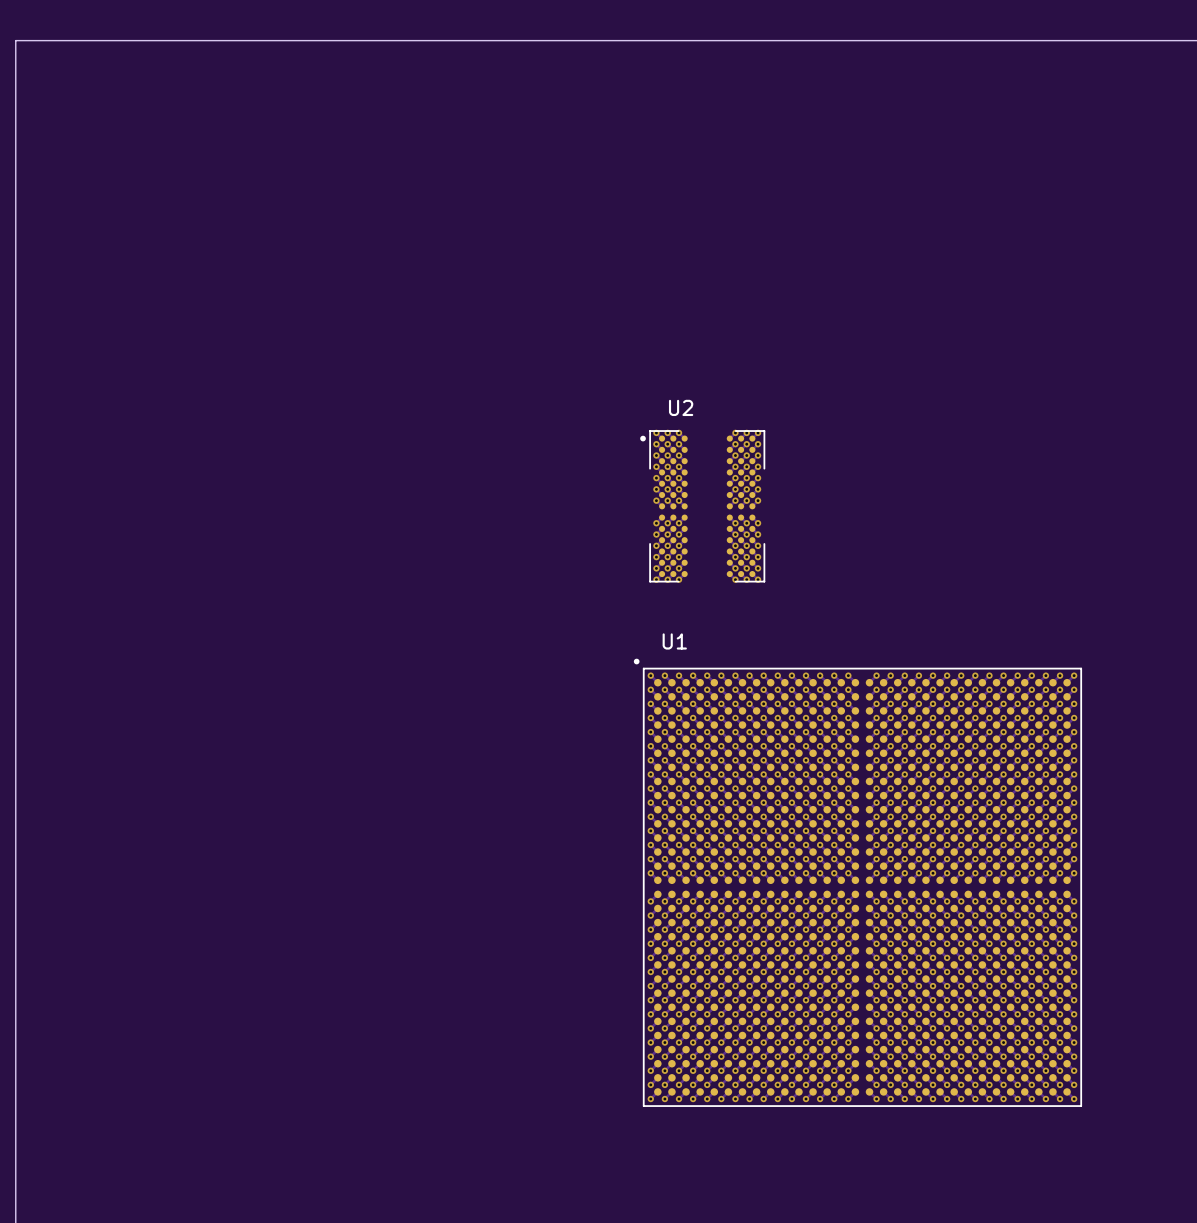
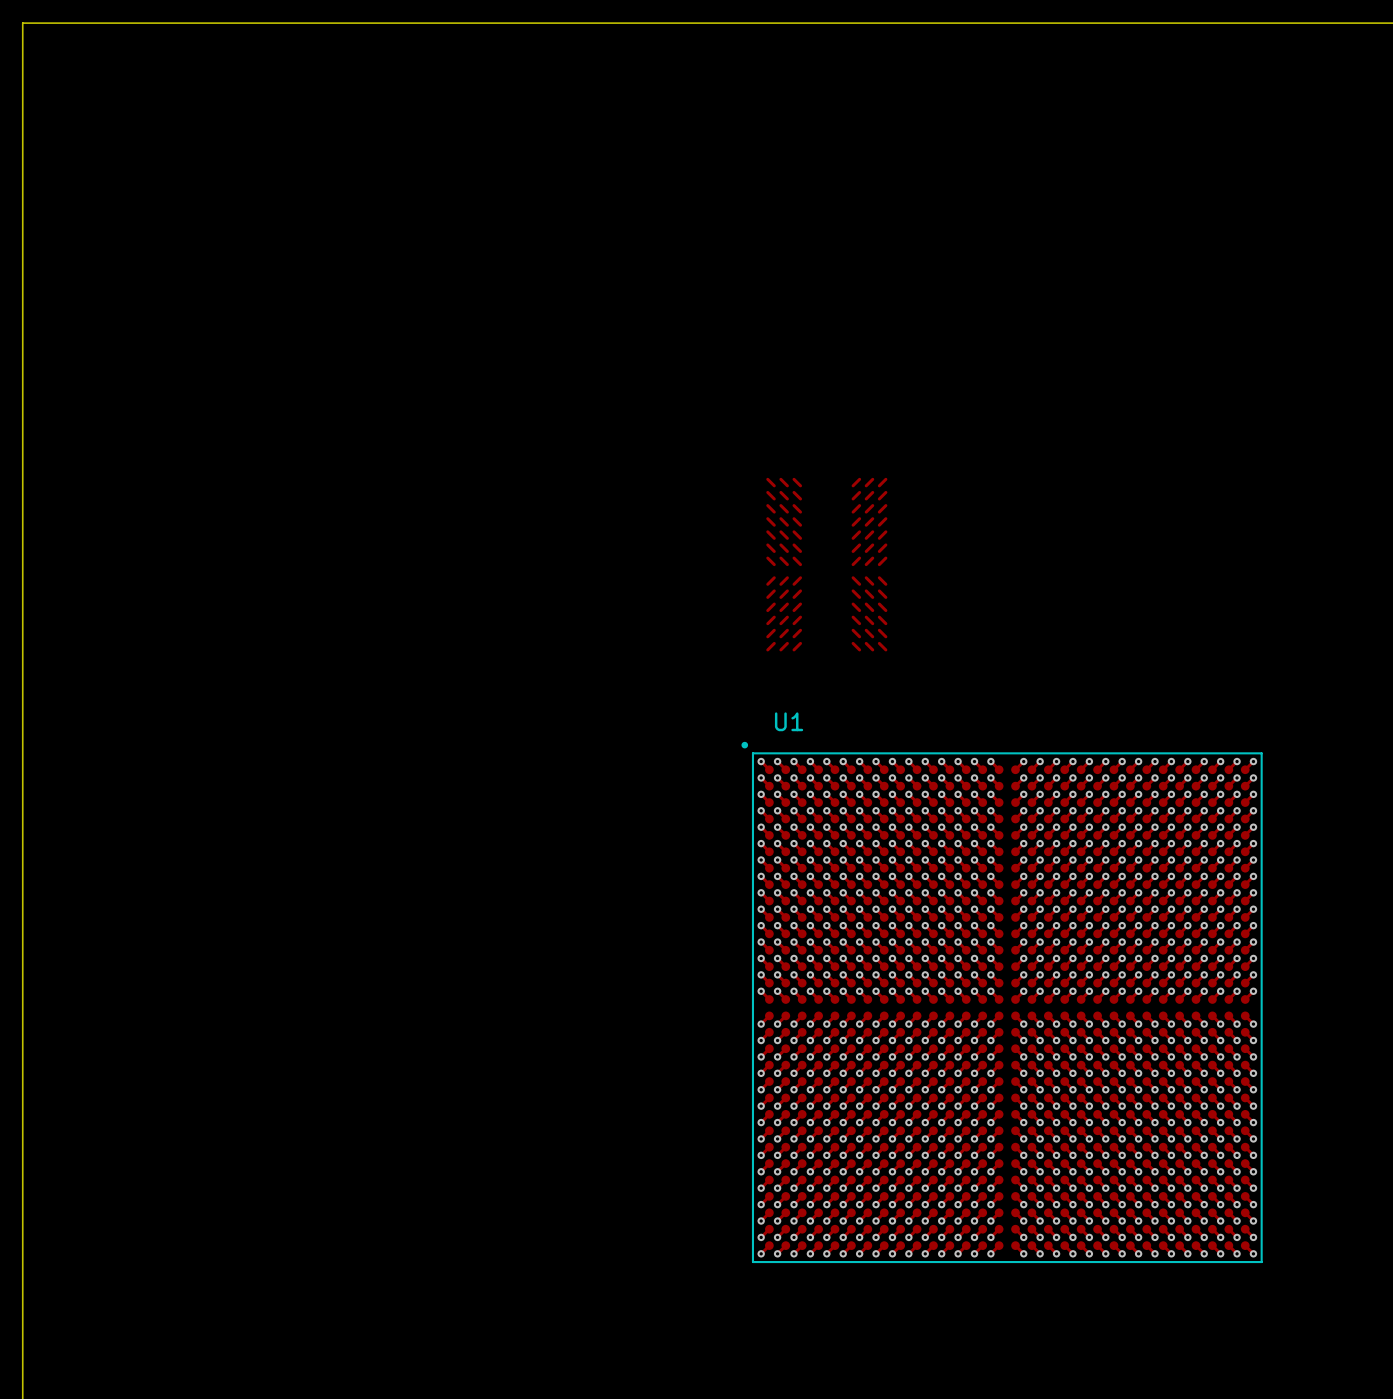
via: (656, 432) -> none
via: (667, 432) -> none
via: (679, 432) -> none
via: (735, 432) -> none
via: (746, 432) -> none
via: (758, 432) -> none
via: (656, 444) -> none
via: (667, 444) -> none
via: (679, 444) -> none
via: (735, 444) -> none
via: (746, 444) -> none
via: (758, 444) -> none
via: (656, 455) -> none
via: (667, 455) -> none
via: (679, 455) -> none
via: (735, 455) -> none
via: (746, 455) -> none
via: (758, 455) -> none
via: (656, 466) -> none
via: (667, 466) -> none
via: (679, 466) -> none
via: (735, 466) -> none
via: (746, 466) -> none
via: (758, 466) -> none
via: (656, 478) -> none
via: (667, 478) -> none
via: (679, 478) -> none
via: (735, 478) -> none
via: (746, 478) -> none
via: (758, 478) -> none
via: (656, 489) -> none
via: (667, 489) -> none
via: (679, 489) -> none
via: (735, 489) -> none
via: (746, 489) -> none
via: (758, 489) -> none
via: (656, 500) -> none
via: (667, 500) -> none
via: (679, 500) -> none
via: (735, 500) -> none
via: (746, 500) -> none
via: (758, 500) -> none
U2: (702, 506) -> none
via: (656, 523) -> none
via: (667, 523) -> none
via: (679, 523) -> none
via: (735, 523) -> none
via: (746, 523) -> none
via: (758, 523) -> none
via: (656, 534) -> none
via: (667, 534) -> none
via: (679, 534) -> none
via: (735, 534) -> none
via: (746, 534) -> none
via: (758, 534) -> none
via: (656, 545) -> none
via: (667, 545) -> none
via: (679, 545) -> none
via: (735, 545) -> none
via: (746, 545) -> none
via: (758, 545) -> none
via: (656, 557) -> none
via: (667, 557) -> none
via: (679, 557) -> none
via: (735, 557) -> none
via: (746, 557) -> none
via: (758, 557) -> none
via: (656, 568) -> none
via: (667, 568) -> none
via: (679, 568) -> none
via: (735, 568) -> none
via: (746, 568) -> none
via: (758, 568) -> none
via: (656, 579) -> none
via: (667, 579) -> none
via: (679, 579) -> none
via: (735, 579) -> none
via: (746, 579) -> none
via: (758, 579) -> none

